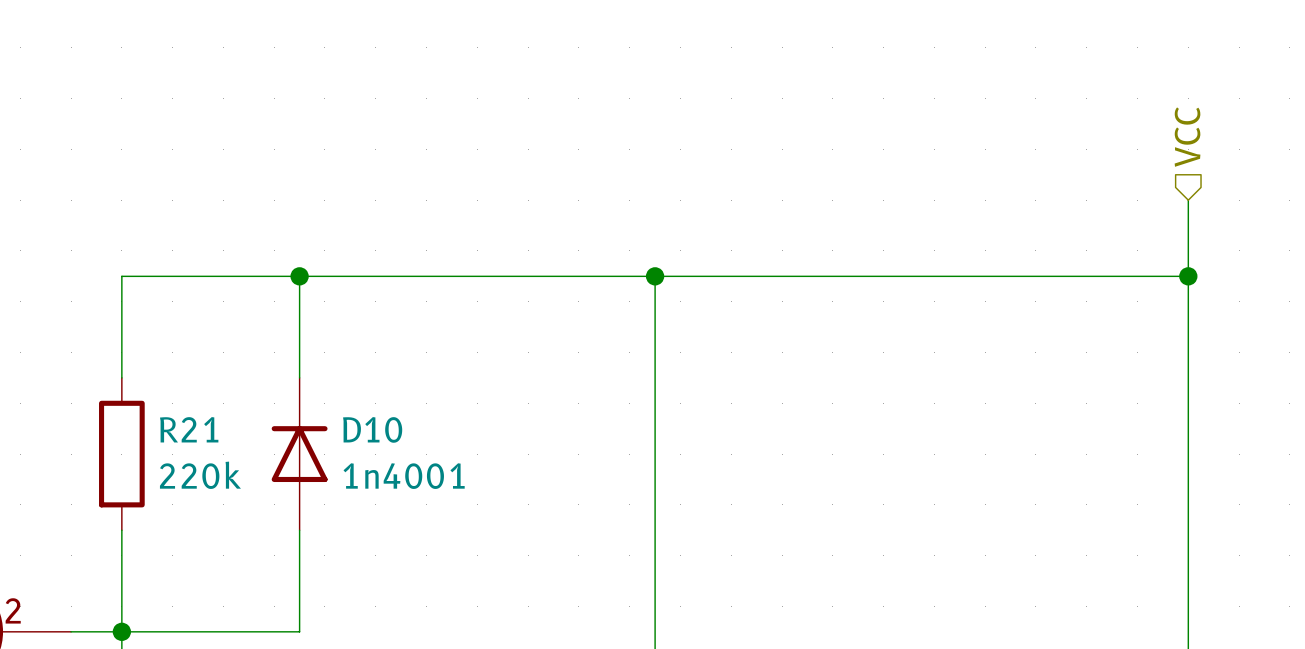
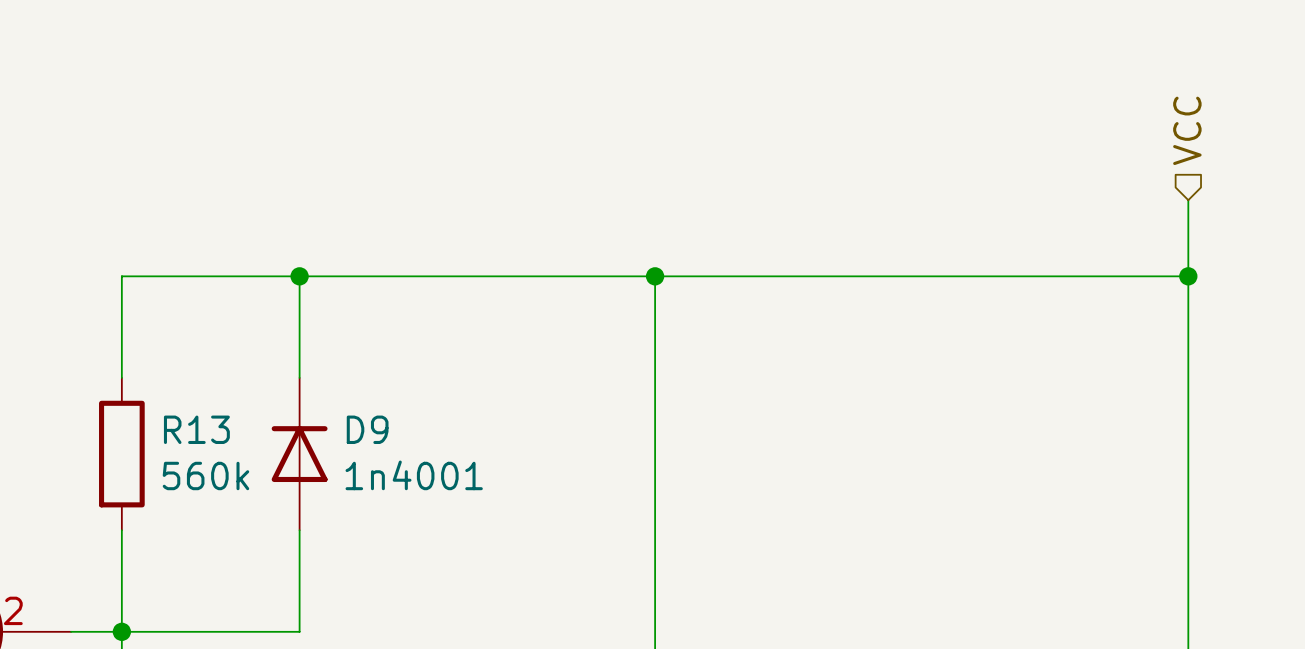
R21 name: R21 (189, 429) -> R13 (196, 429)
D10 name: D10 (372, 429) -> D9 (367, 429)
R21 value: 220k (200, 475) -> 560k (205, 475)

